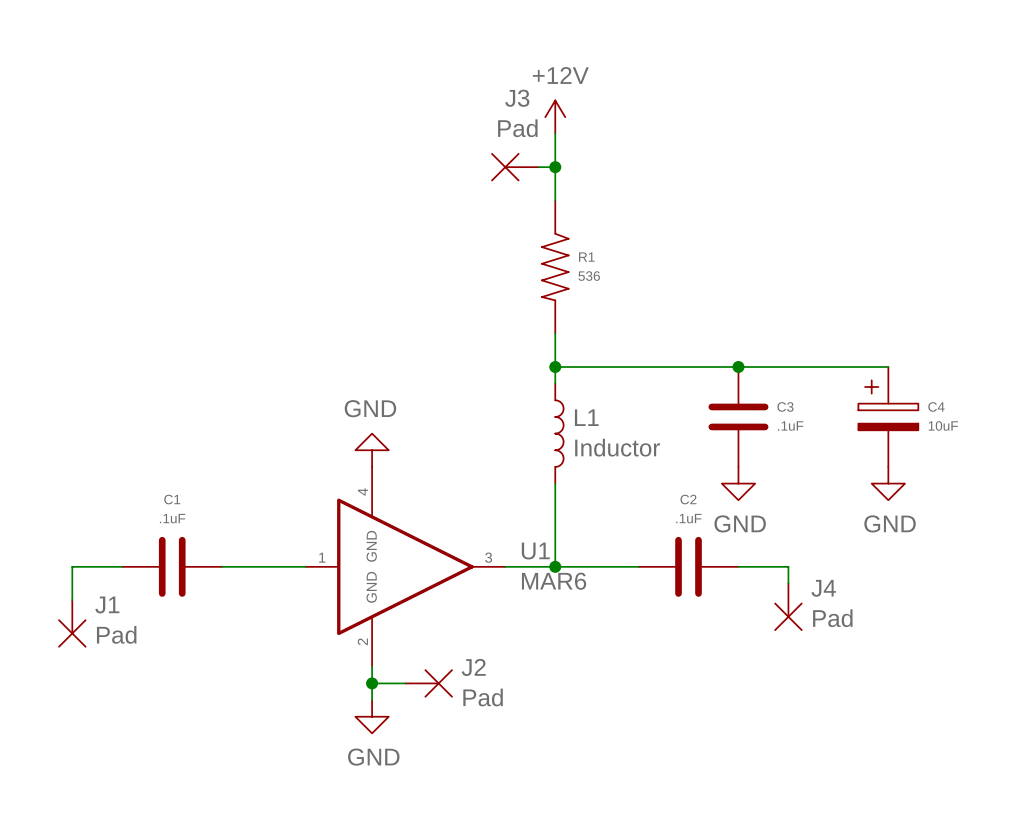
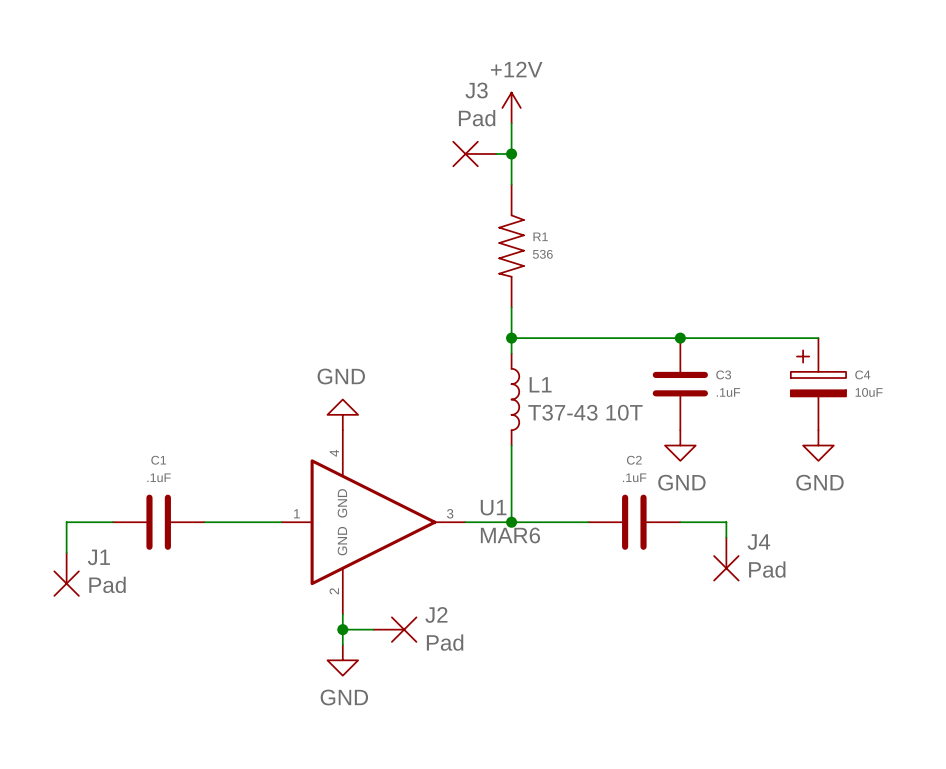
L1 value: Inductor (617, 447) -> T37-43 10T (585, 412)

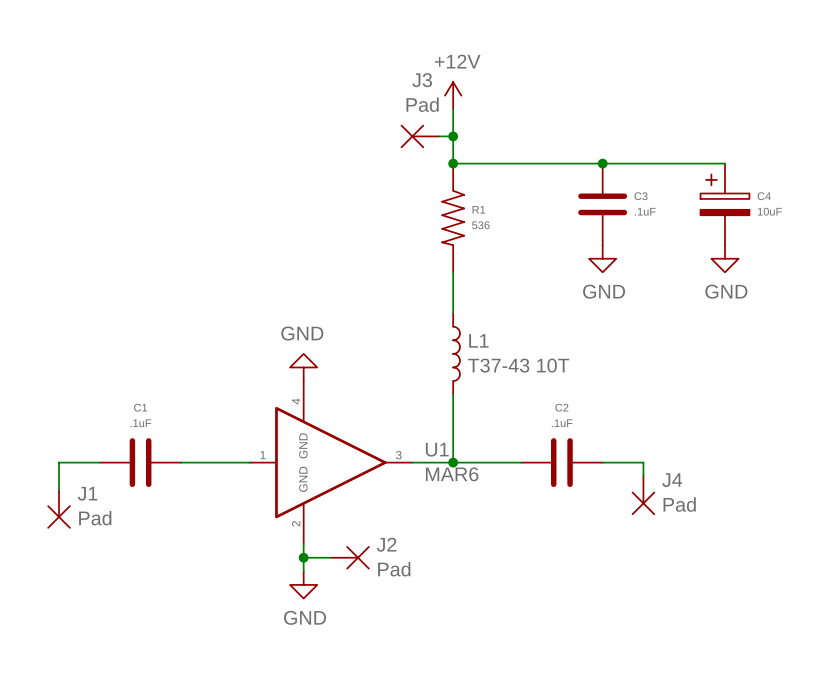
junction: none -> (453, 163)
junction: none -> (602, 163)
power symbol: none -> GND (602, 258)
power symbol: none -> GND (724, 258)
wire: (511, 338) (818, 338) -> (453, 163) (724, 163)
junction: (511, 338) -> none
junction: (680, 338) -> none
C3 position: (680, 384) -> (602, 204)
C4 position: (818, 384) -> (724, 204)
power symbol: GND (680, 445) -> none
power symbol: GND (818, 445) -> none

